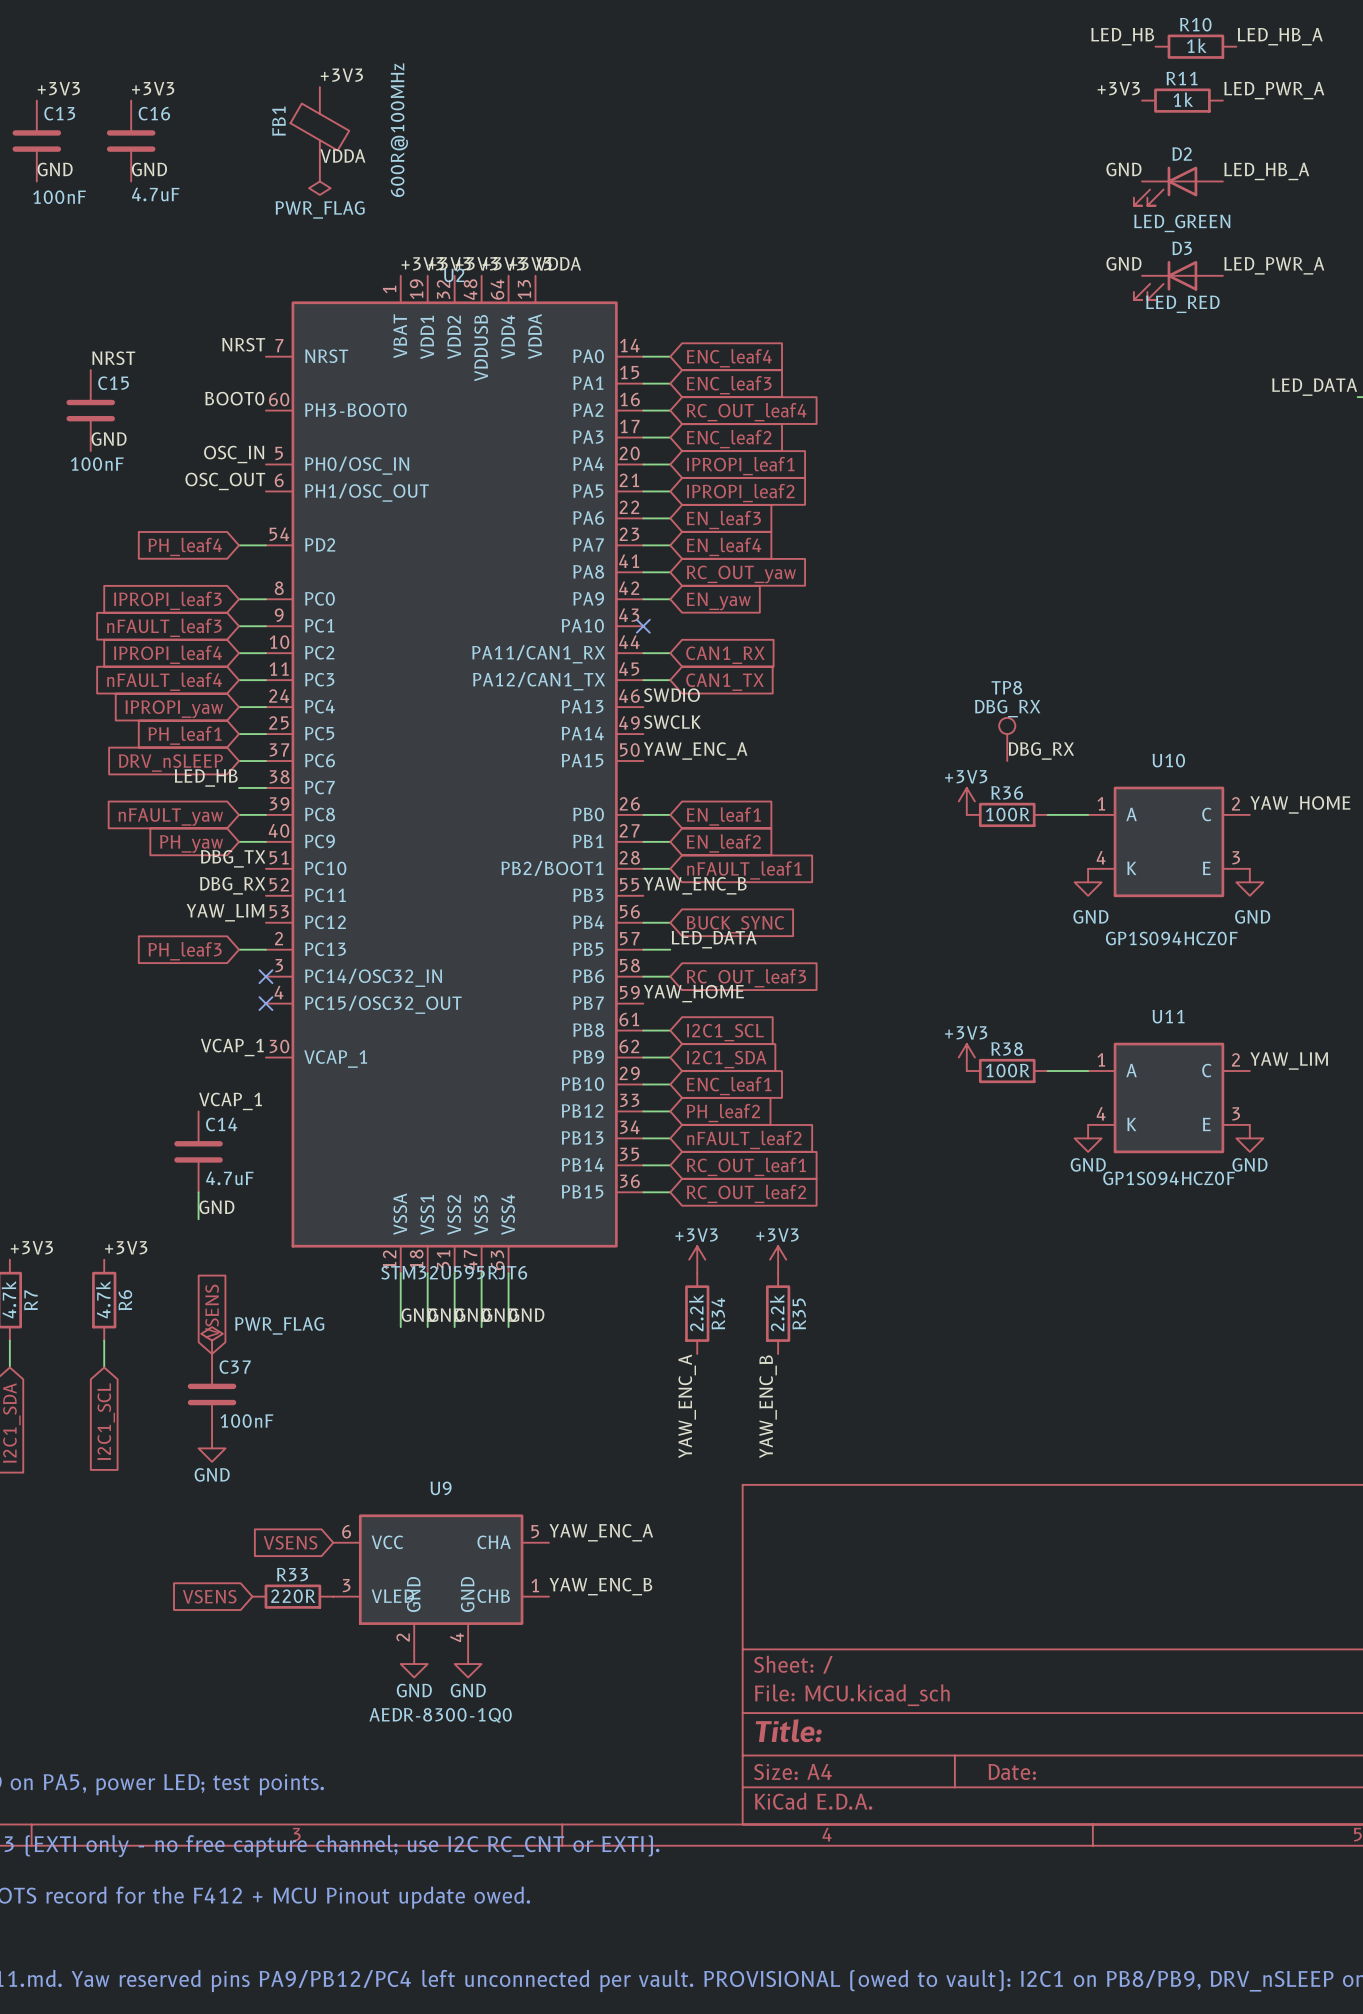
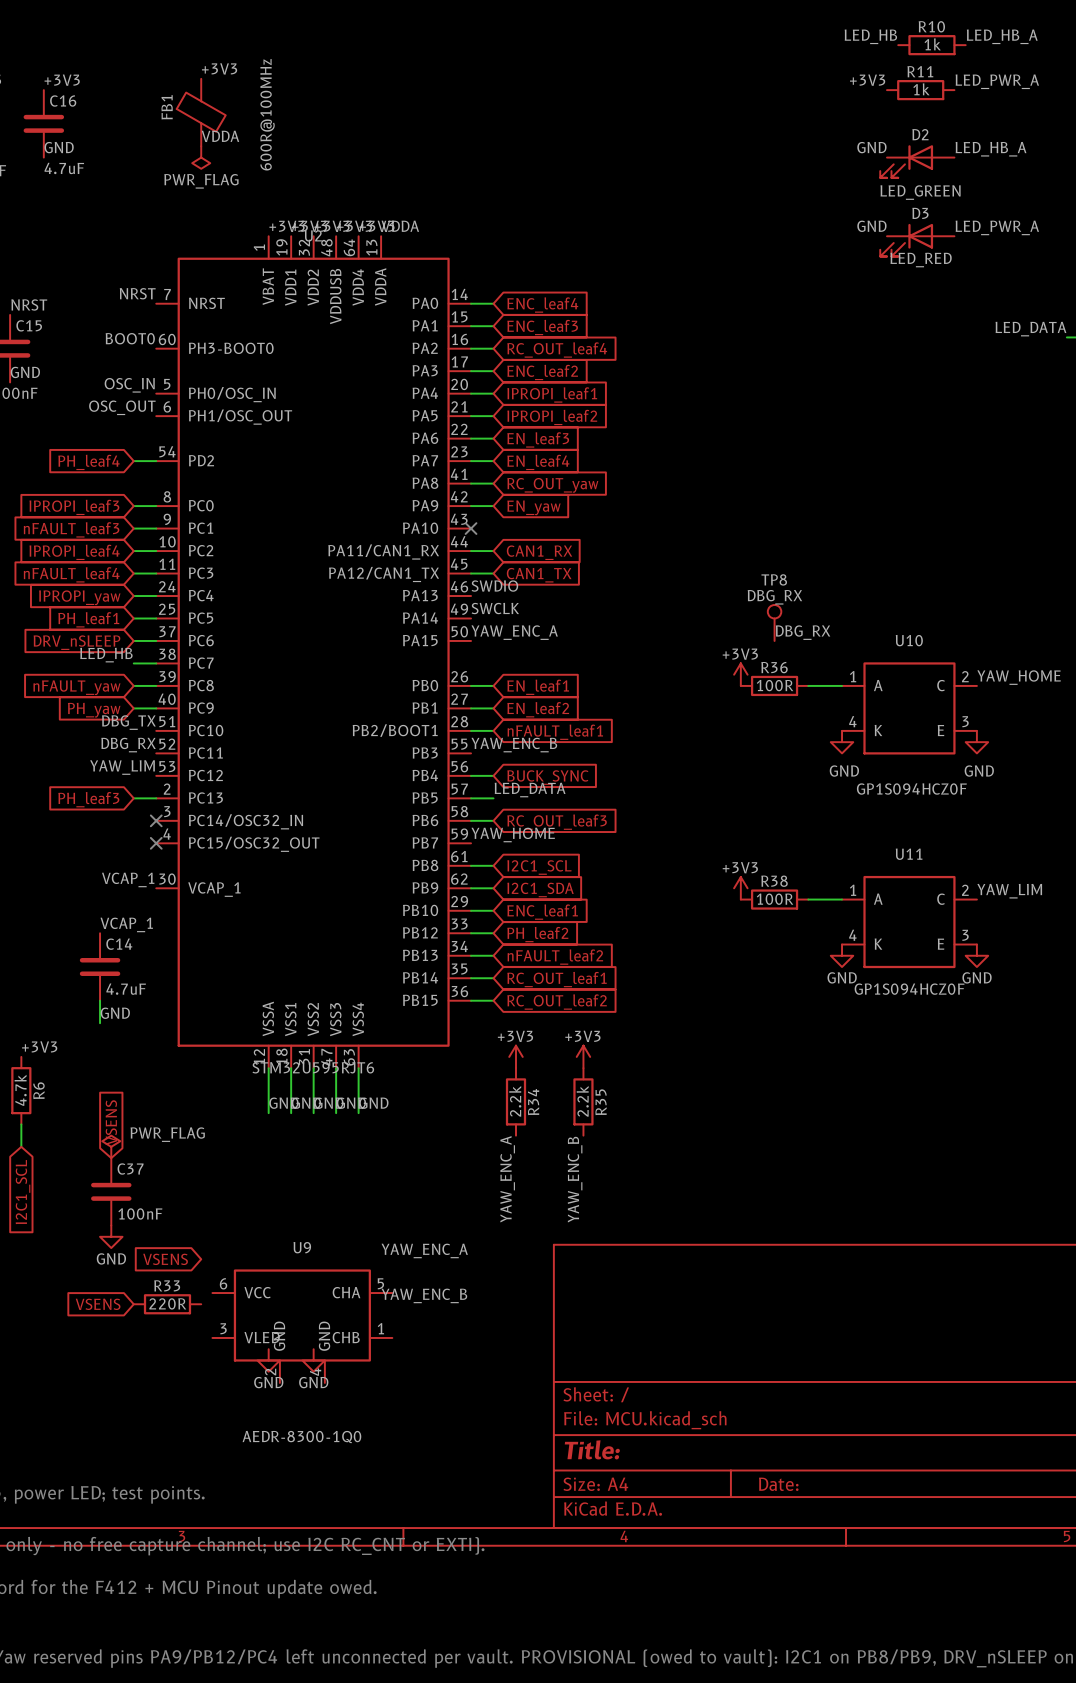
global label position: VSENS (212, 1311) -> VSENS (111, 1122)
power symbol position: PWR_FLAG (212, 1340) -> PWR_FLAG (111, 1146)
C37 position: (212, 1394) -> (111, 1191)
power symbol position: GND (212, 1448) -> GND (111, 1236)
label position: YAW_ENC_A (601, 1532) -> YAW_ENC_A (424, 1250)
global label position: VSENS (290, 1542) -> VSENS (165, 1259)
label position: YAW_ENC_B (600, 1586) -> YAW_ENC_B (424, 1295)
global label position: VSENS (209, 1596) -> VSENS (98, 1304)
R33 position: (292, 1596) -> (167, 1304)
power symbol: none -> GND (268, 1360)
power symbol: none -> GND (313, 1360)
power symbol: GND (414, 1664) -> none
power symbol: GND (468, 1664) -> none

